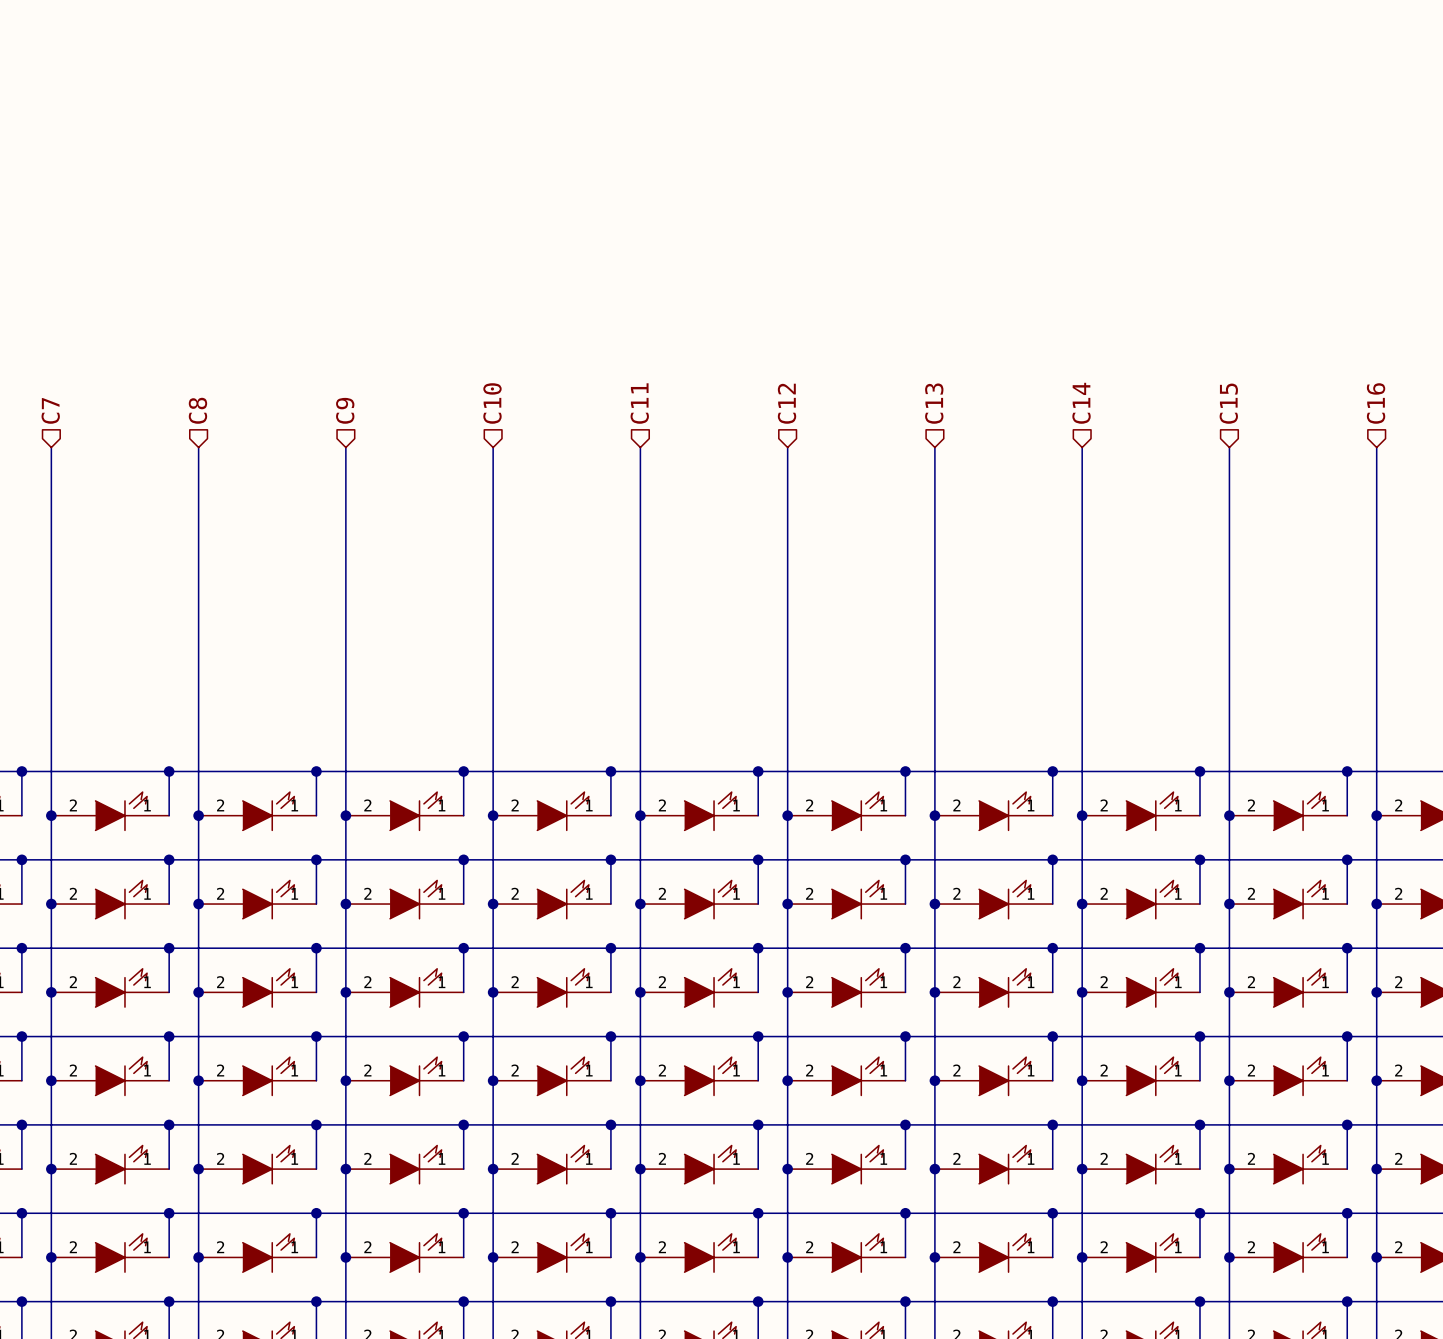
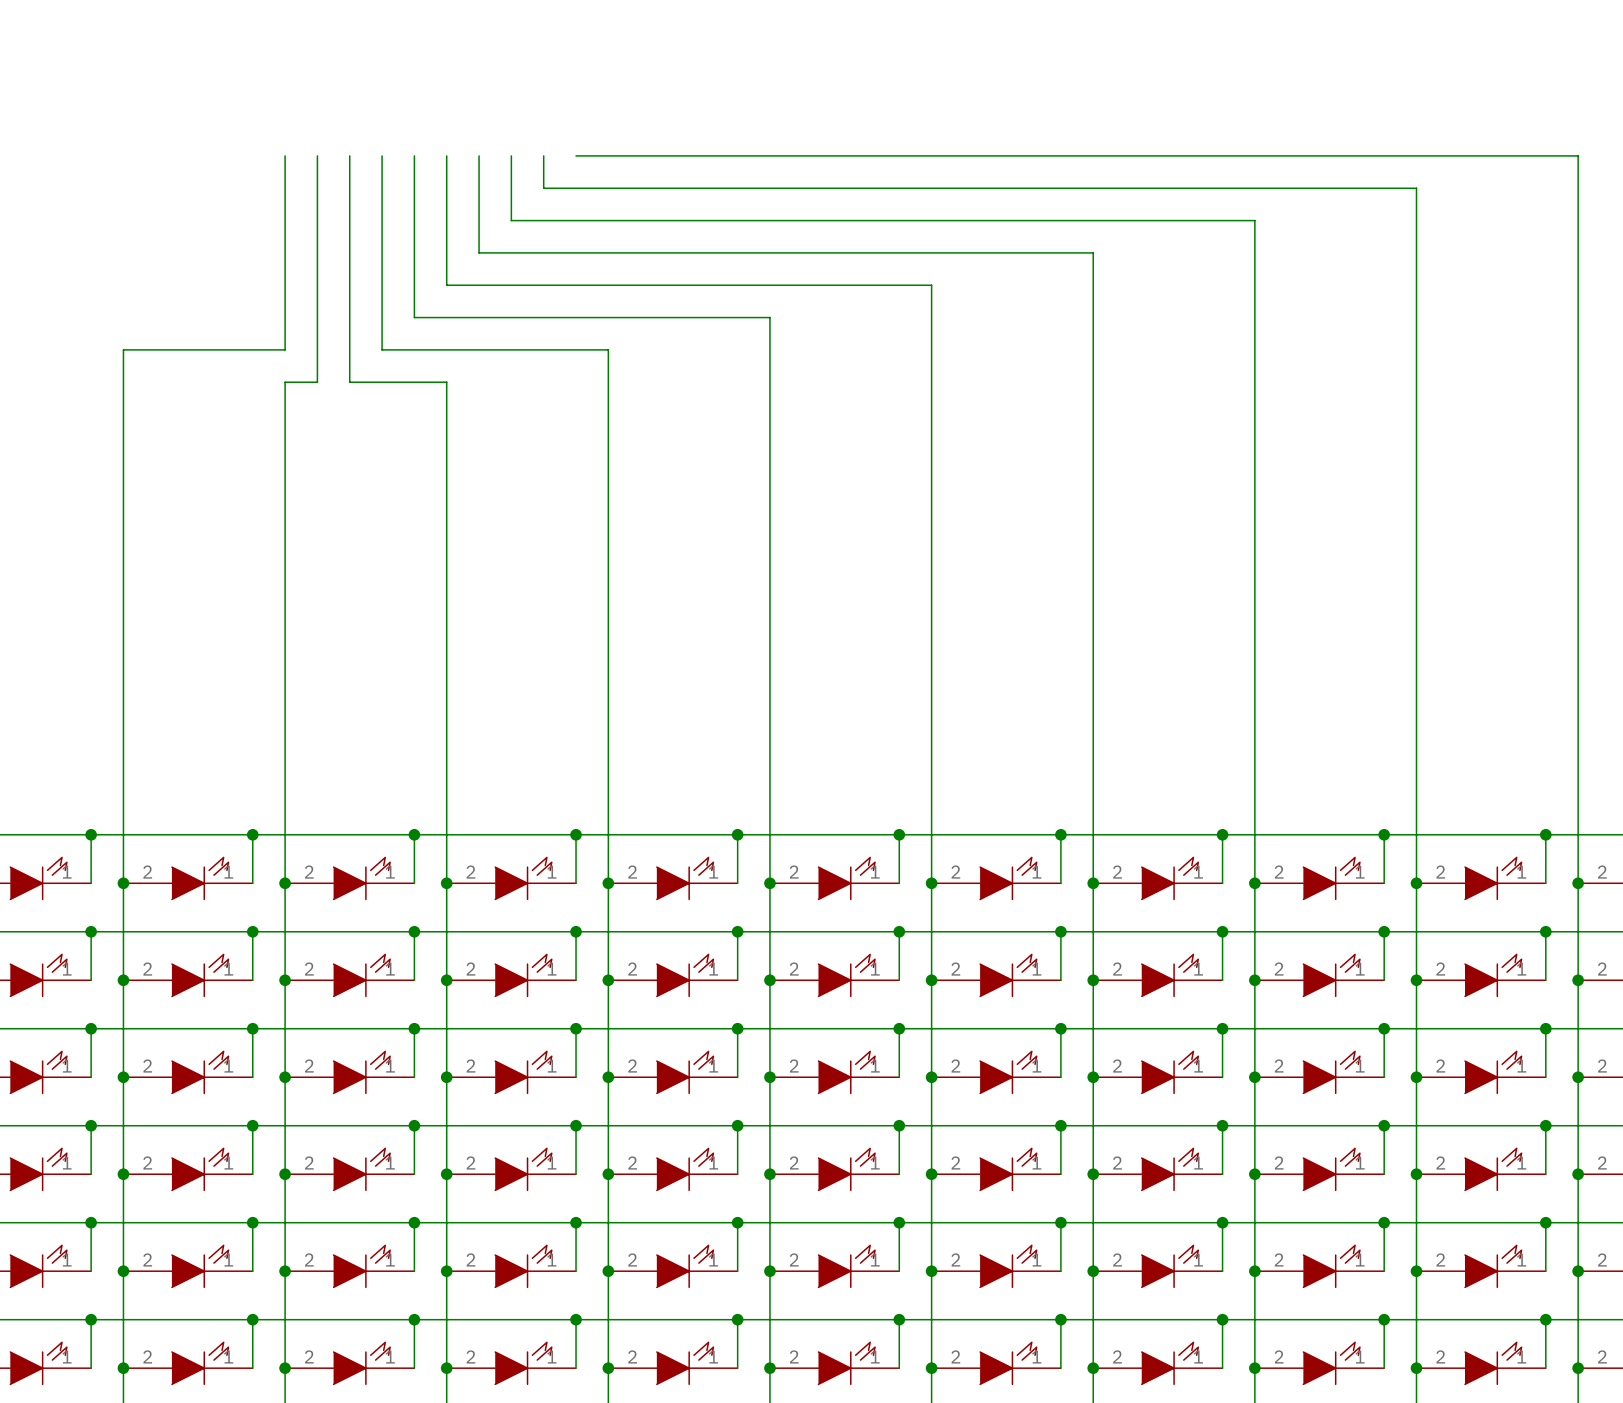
wire: none -> (285, 155) (285, 349) (123, 349) (123, 479)
wire: none -> (317, 155) (317, 382) (285, 382) (285, 479)
wire: none -> (349, 155) (349, 382) (446, 382) (446, 479)
wire: none -> (382, 155) (382, 349) (608, 349) (608, 479)
wire: none -> (414, 155) (414, 317) (769, 317) (769, 479)
wire: none -> (446, 155) (446, 285) (931, 285) (931, 479)
wire: none -> (479, 155) (479, 252) (1093, 252) (1093, 479)
wire: none -> (511, 155) (511, 220) (1254, 220) (1254, 479)
wire: none -> (543, 155) (543, 188) (1416, 188) (1416, 479)
wire: none -> (576, 155) (1578, 155) (1578, 479)
hierarchical label: C10 (492, 403) -> none
hierarchical label: C11 (639, 403) -> none
hierarchical label: C12 (787, 403) -> none
hierarchical label: C13 (934, 403) -> none
hierarchical label: C14 (1081, 403) -> none
hierarchical label: C15 (1228, 403) -> none
hierarchical label: C16 (1376, 403) -> none
hierarchical label: C7 (50, 410) -> none
hierarchical label: C8 (197, 410) -> none
hierarchical label: C9 (345, 410) -> none

